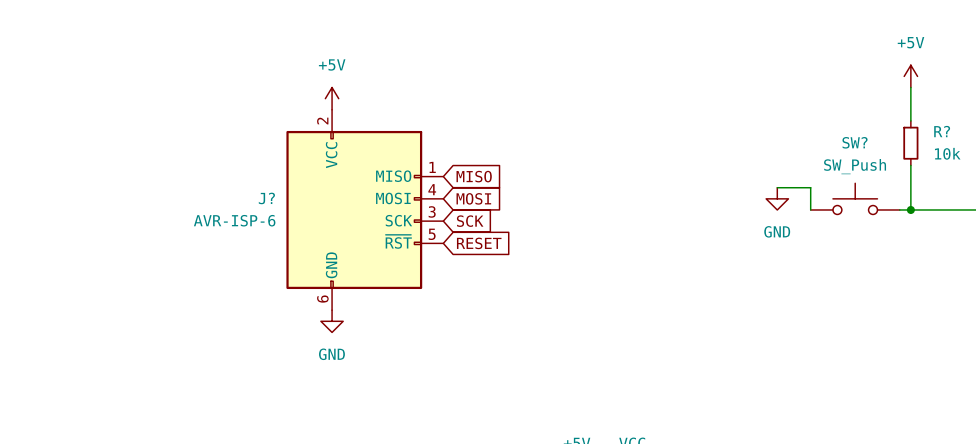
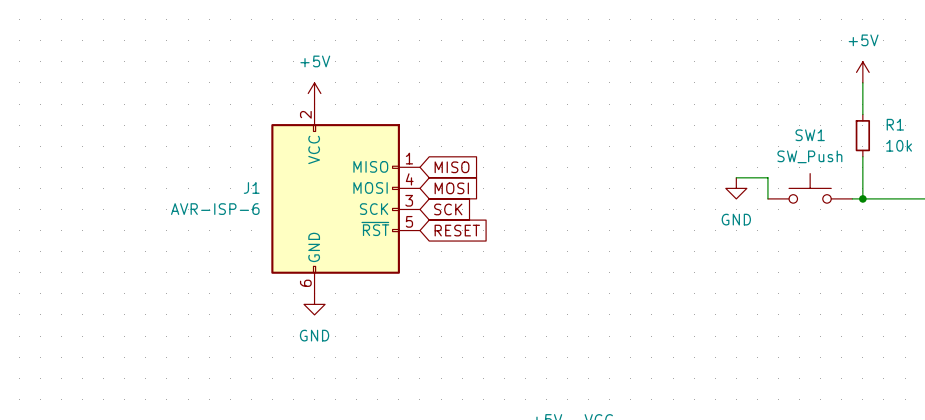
R? name: R? (942, 131) -> R1 (895, 124)
SW? name: SW? (855, 142) -> SW1 (810, 135)
J? name: J? (266, 198) -> J1 (251, 187)

